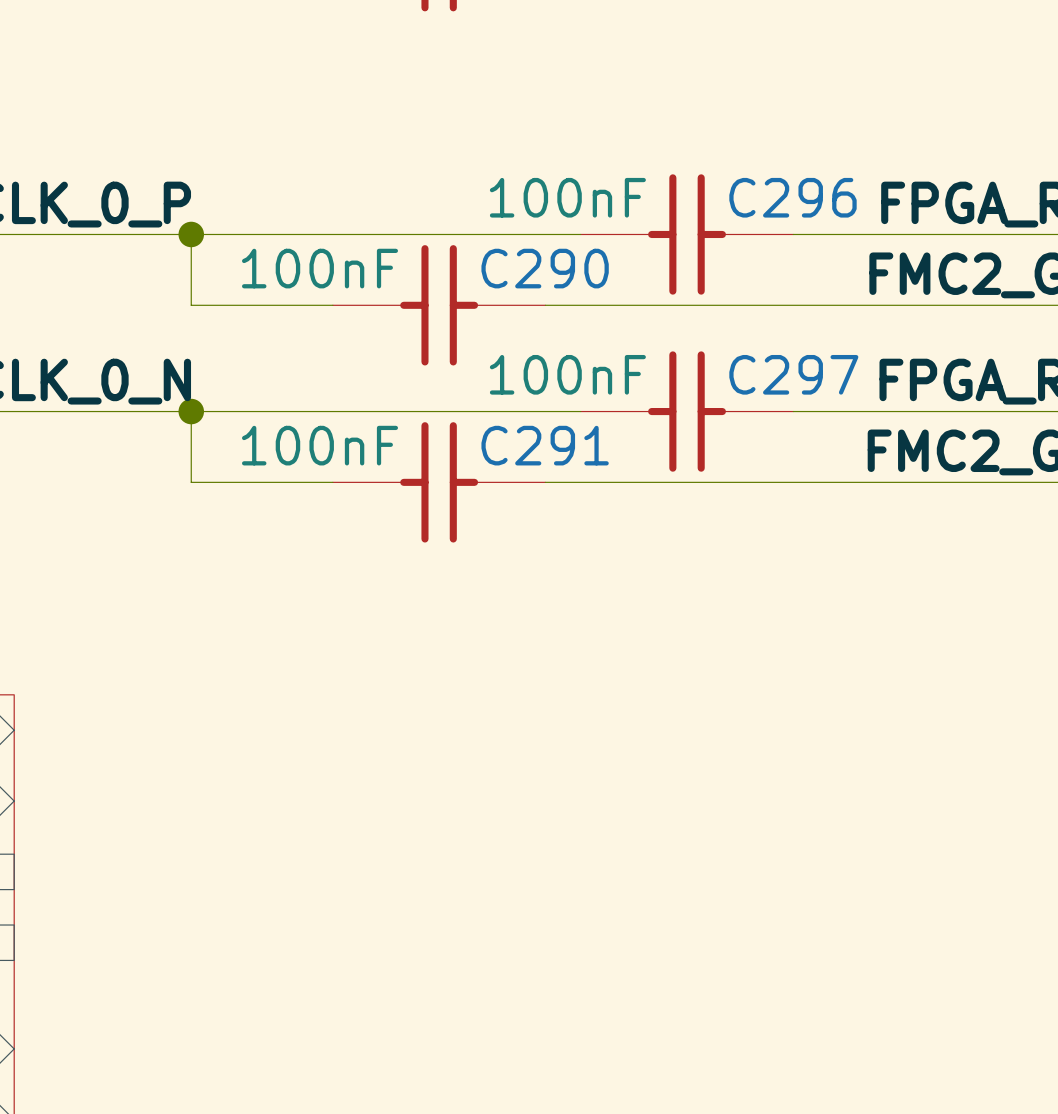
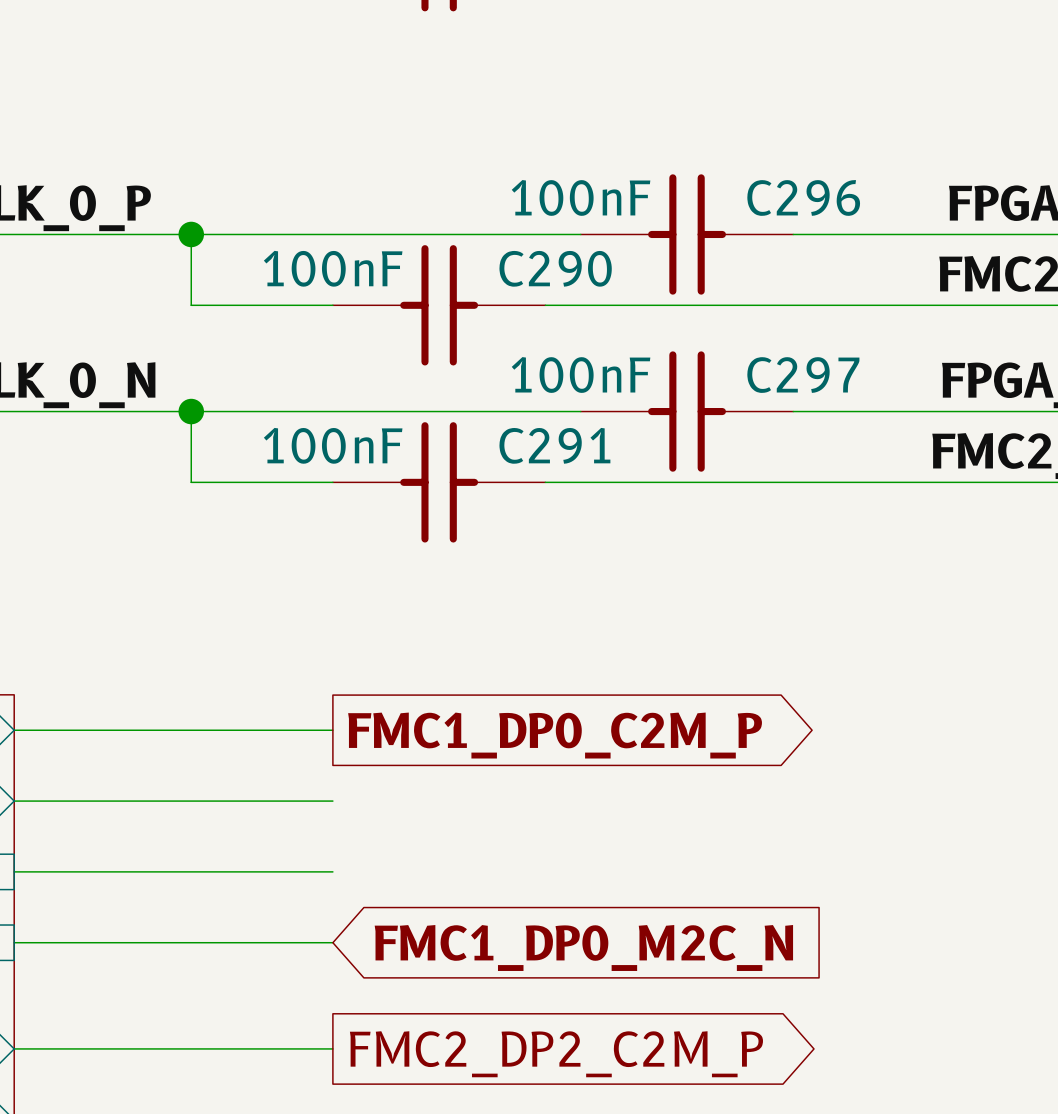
wire: none -> (14, 730) (332, 730)
global label: none -> FMC1_DP0_C2M_P (555, 735)
wire: none -> (14, 801) (332, 801)
wire: none -> (14, 871) (332, 871)
wire: none -> (14, 942) (332, 942)
global label: none -> FMC1_DP0_M2C_N (583, 947)
wire: none -> (14, 1048) (332, 1048)
global label: none -> FMC2_DP2_C2M_P (556, 1054)

